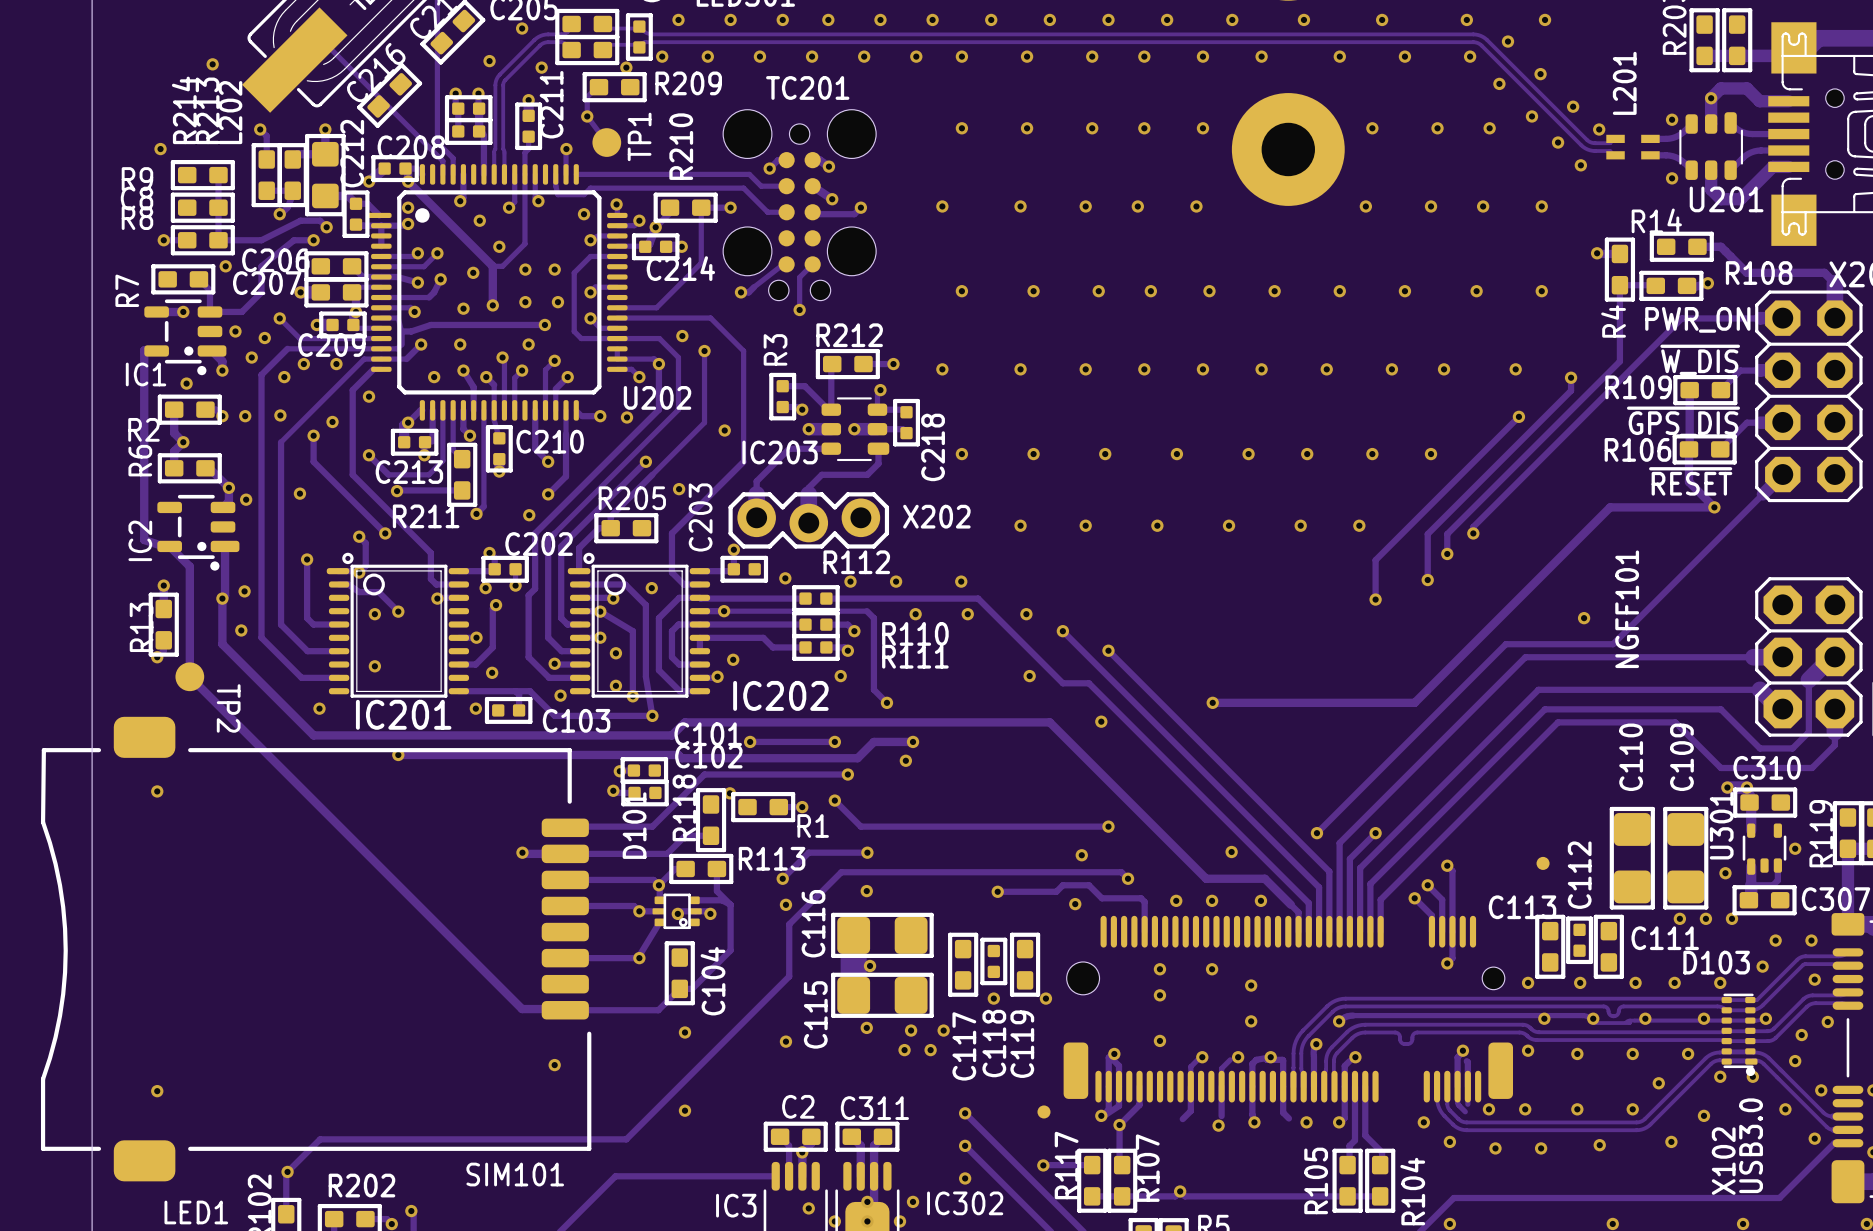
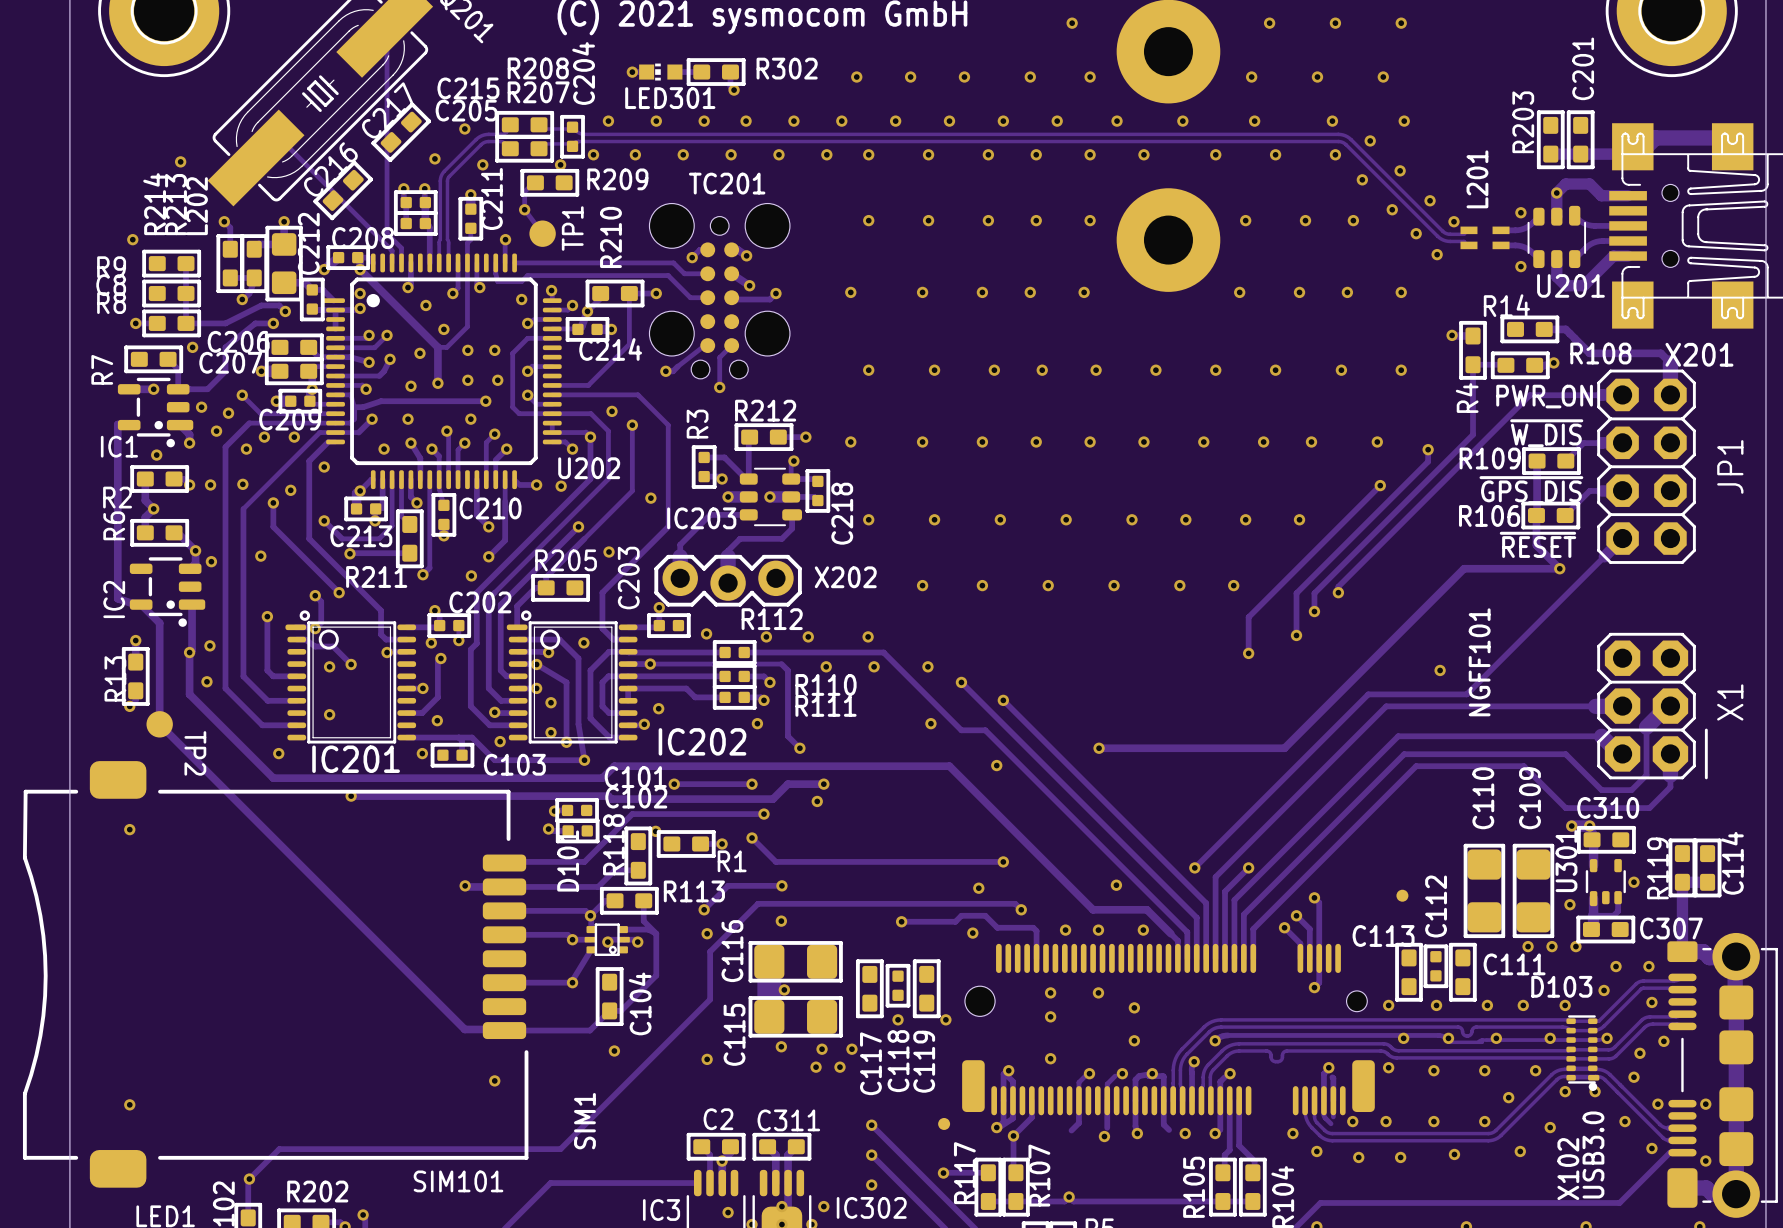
text: none -> SIM1 (584, 1121)
via: (684, 1110) -> none

